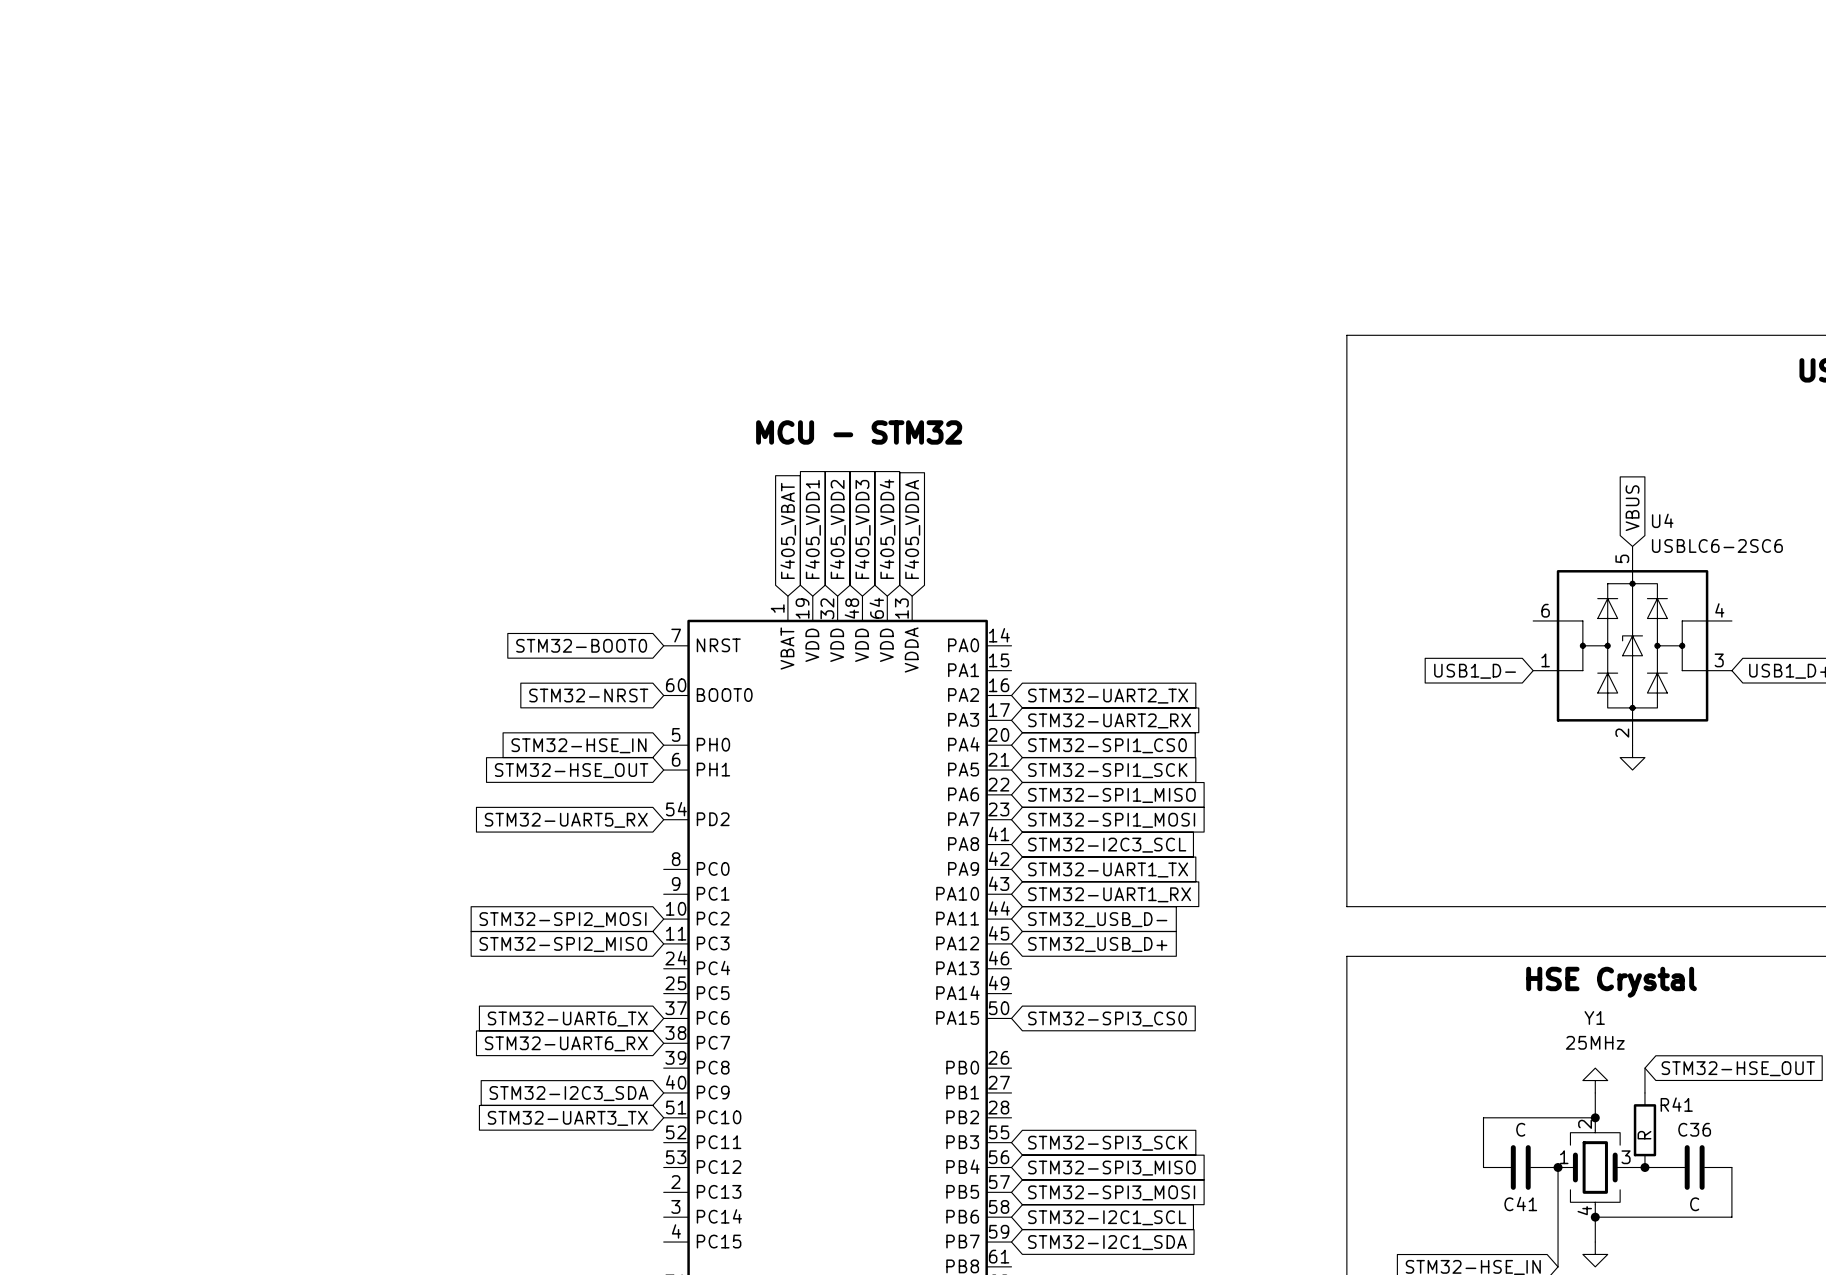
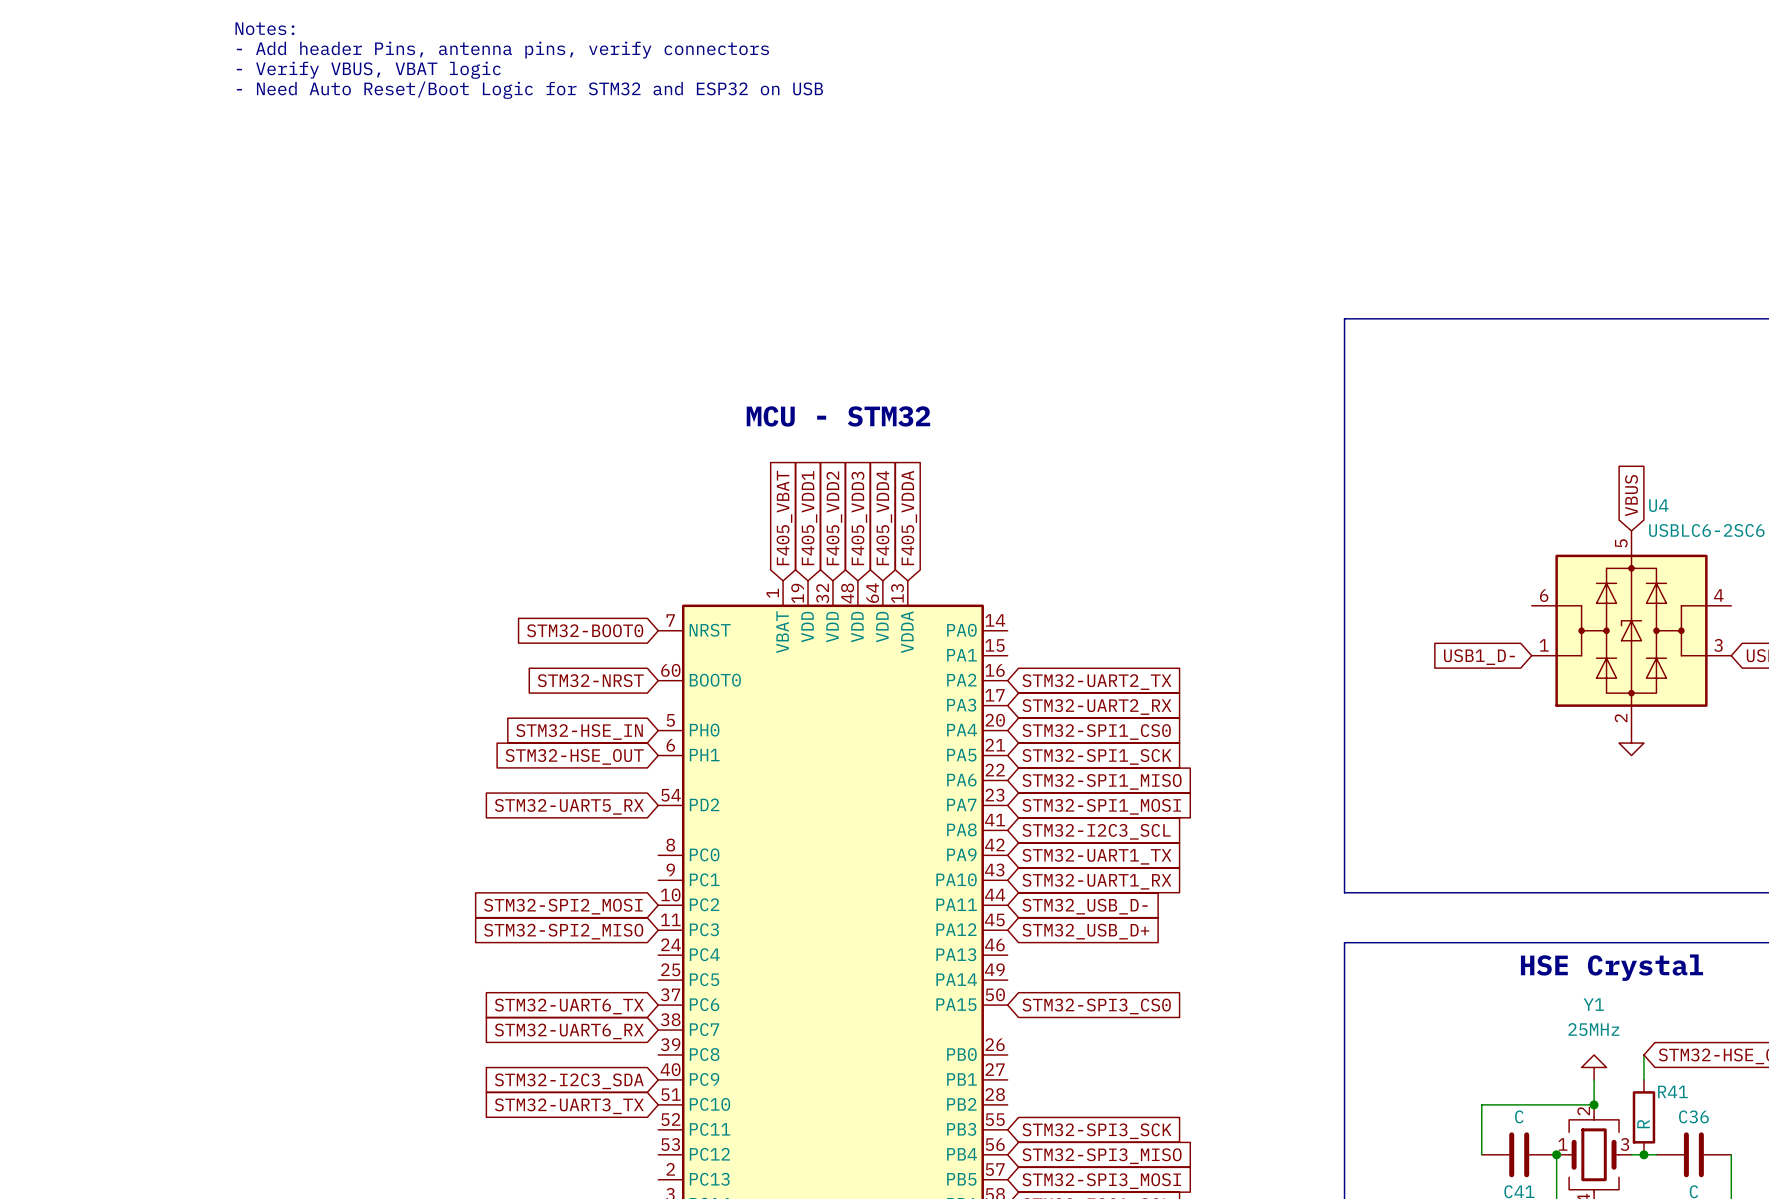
text: none -> Notes: (264, 28)
text: none -> - Add header Pins, antenna pins, verify connectors (502, 50)
text: none -> - Verify VBUS, VBAT logic (368, 70)
text: none -> - Need Auto Reset/Boot Logic for STM32 and ESP32 on USB (529, 90)

